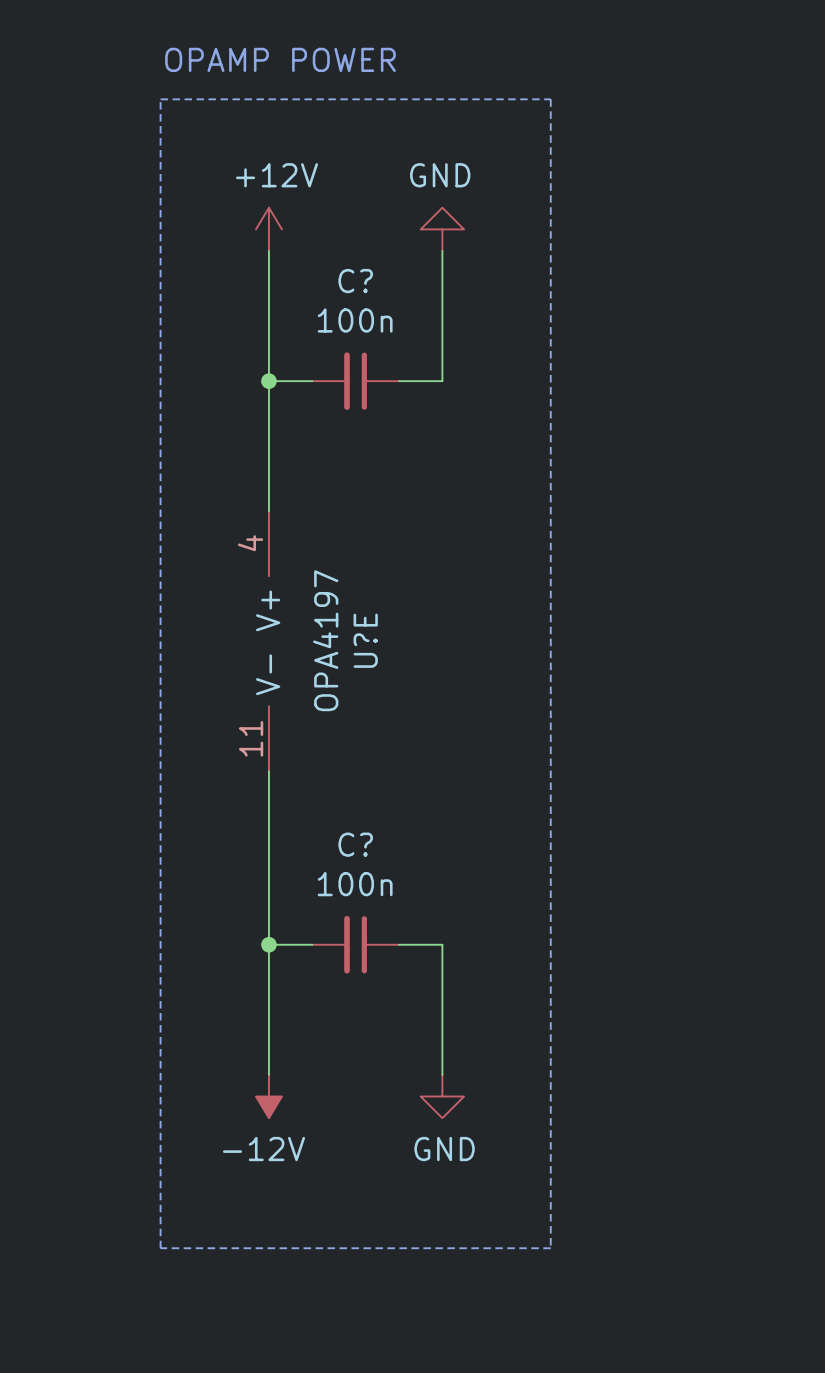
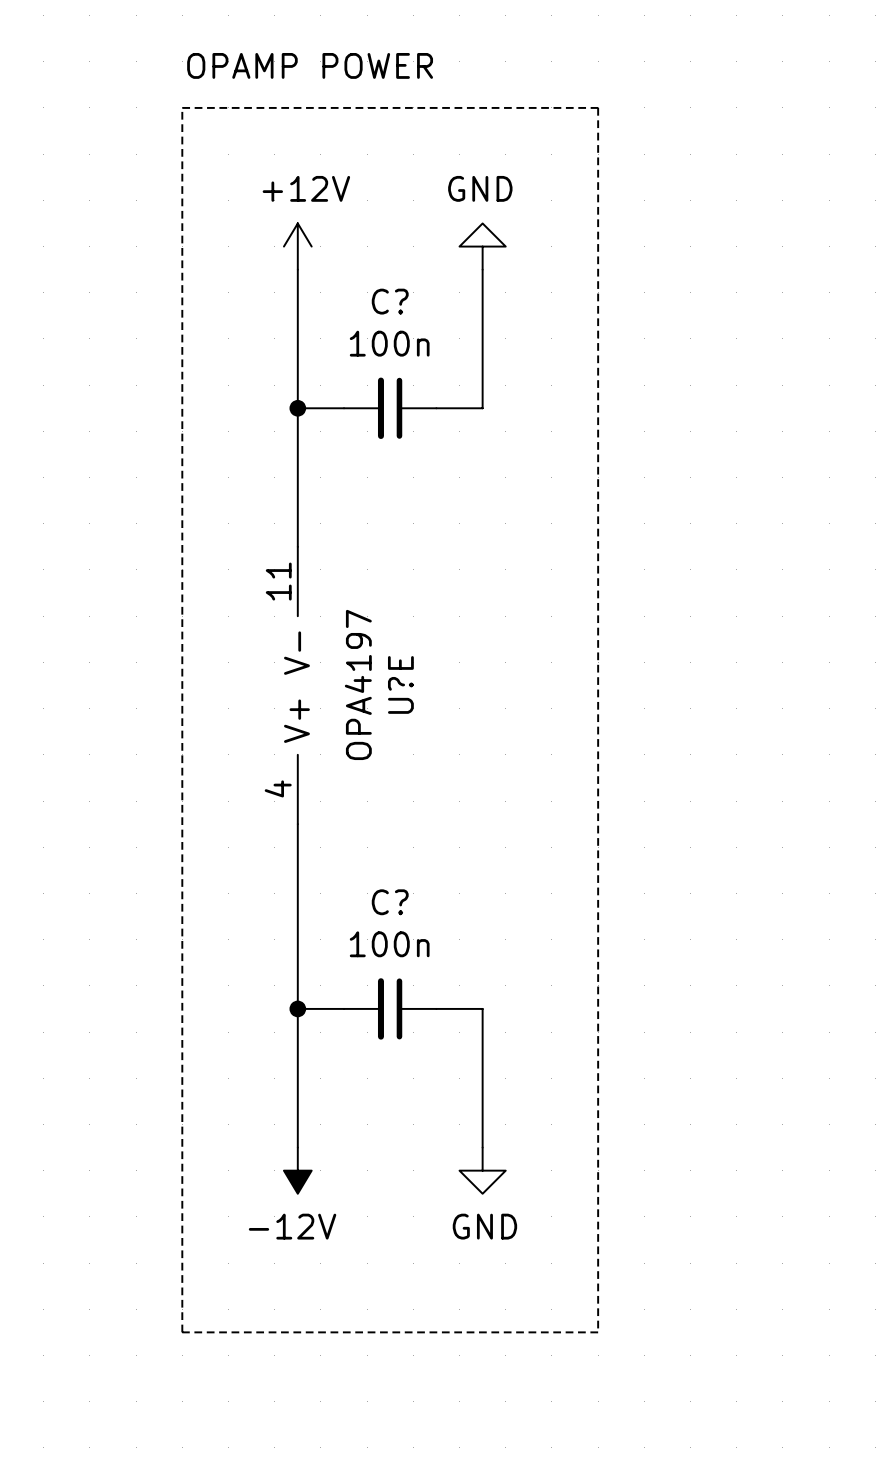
U?E rotation: 0° (268, 641) -> 180° (297, 685)

